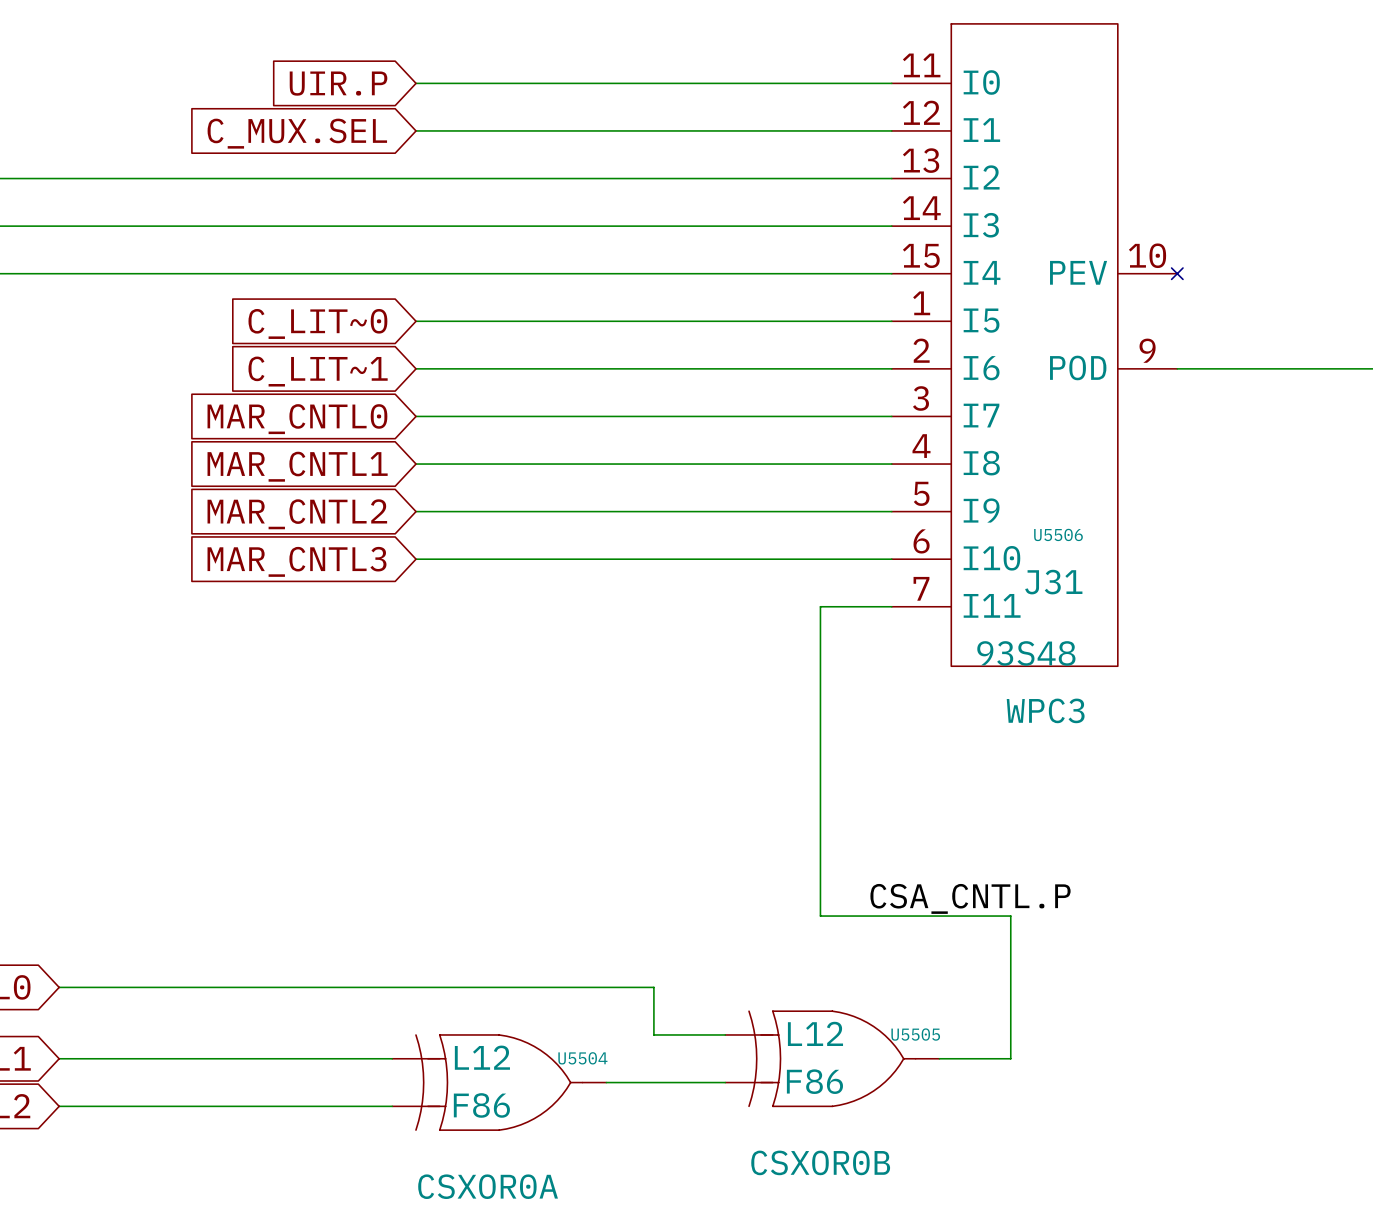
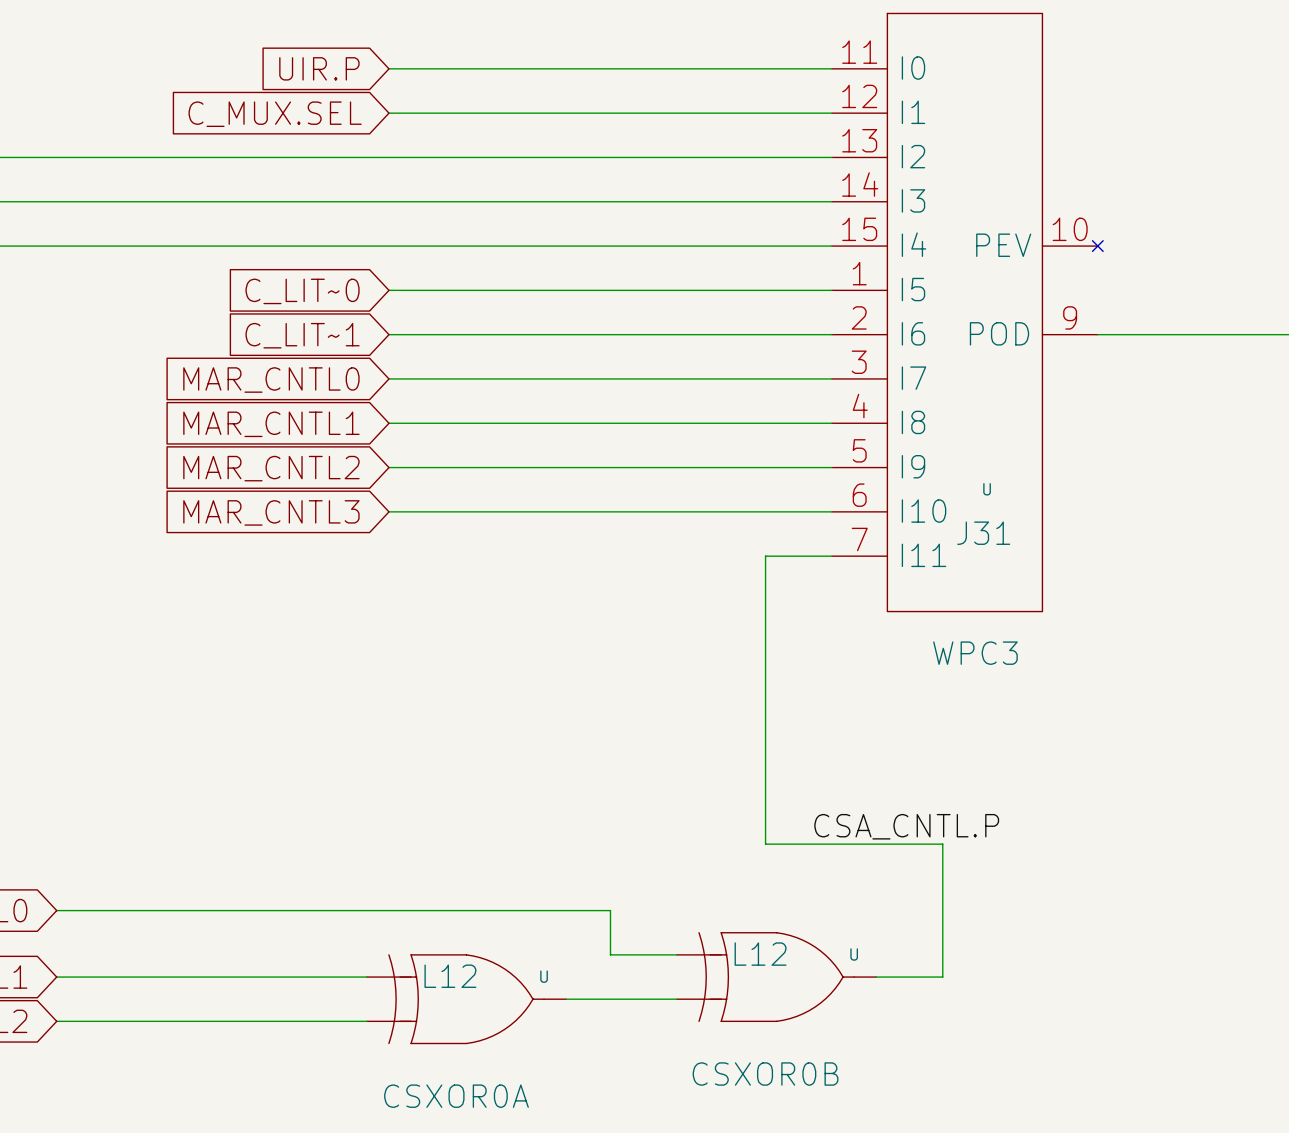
U5506 name: U5506 (1058, 534) -> U (987, 489)
U5506 value: 93S48 (1026, 653) -> none
U5505 name: U5505 (915, 1034) -> U (854, 954)
U5504 name: U5504 (582, 1058) -> U (544, 976)
U5505 value: F86 (814, 1081) -> none
U5504 value: F86 (481, 1105) -> none

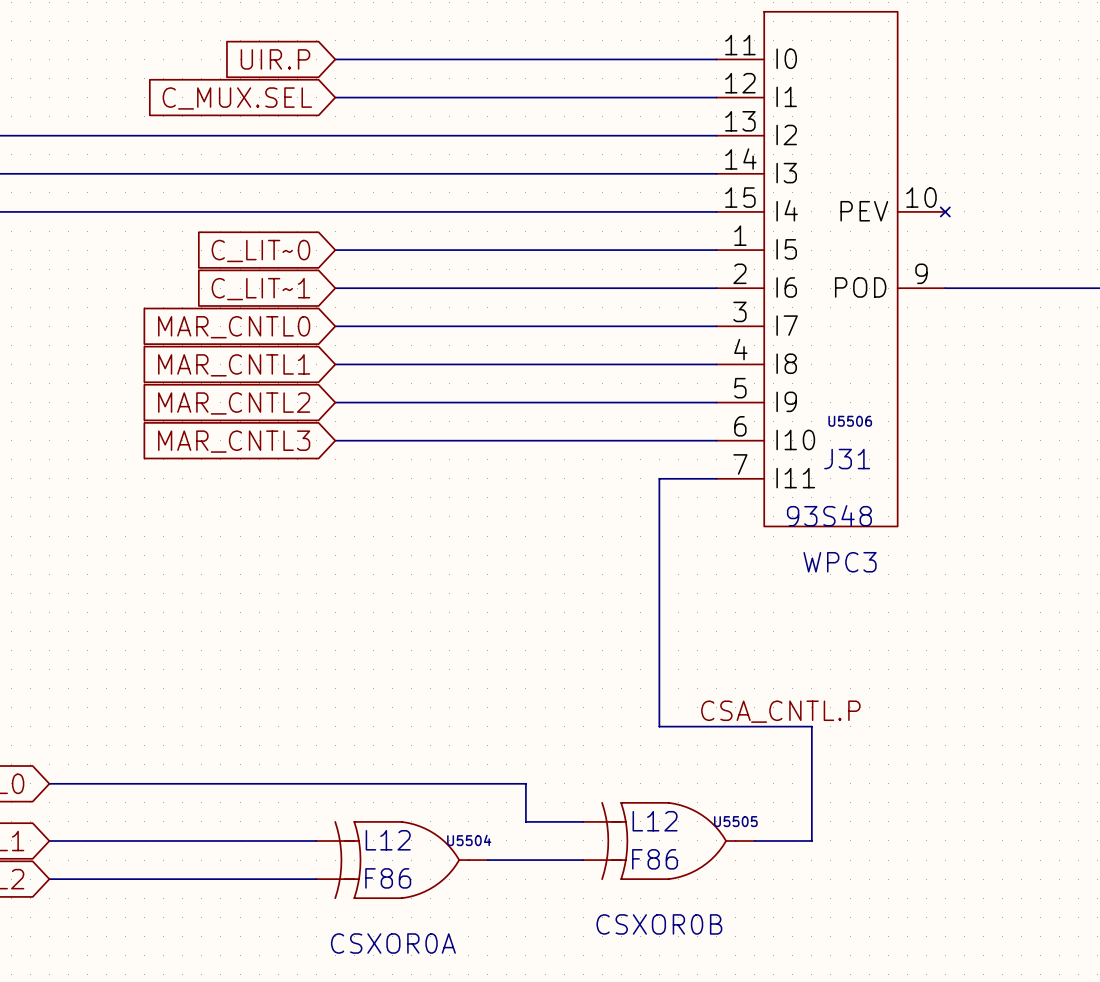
U name: U (987, 489) -> U5506 (850, 421)
U value: none -> 93S48 (829, 515)
U name: U (854, 954) -> U5505 (735, 821)
U name: U (544, 976) -> U5504 (469, 840)
U value: none -> F86 (655, 859)
U value: none -> F86 (388, 878)

